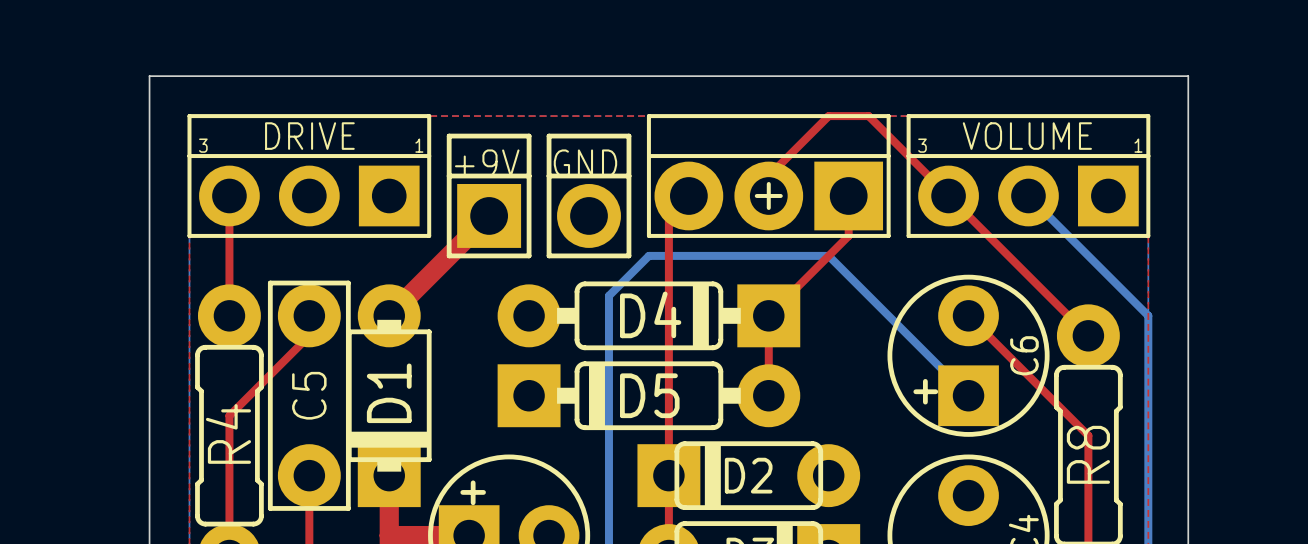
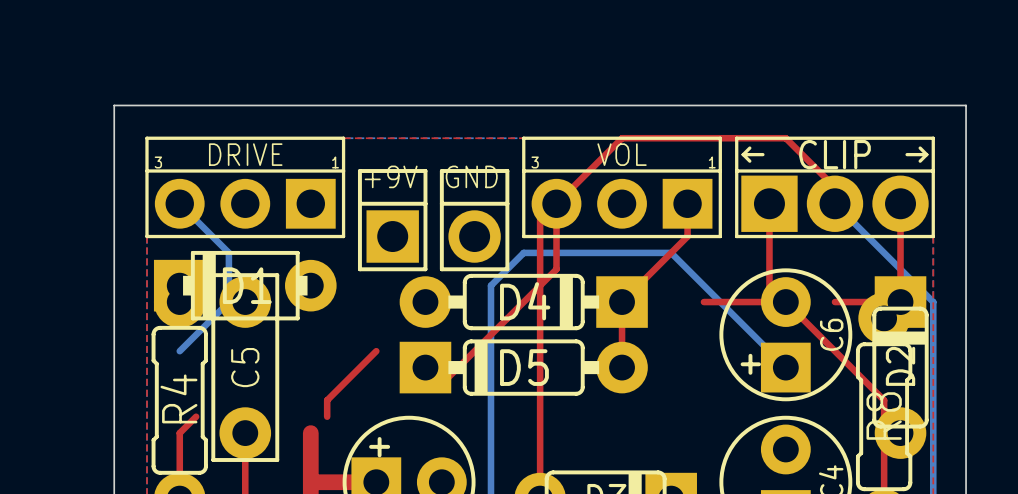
top track: (828, 116) (768, 176) (768, 195) -> (671, 138) (622, 138) (556, 203) (556, 269) (441, 383)
top track: (868, 116) (1088, 335) -> (703, 138) (785, 138) (834, 187) (834, 203)
CLIP side: bottom (768, 176) -> top (834, 187)
VOL: none -> (622, 187)
VOLUME: (1028, 176) -> none
top track: (229, 195) (229, 315) -> none
bottom track: none -> (179, 203) (228, 252) (228, 302) (179, 351)
part position: (489, 195) -> (392, 220)
part position: (589, 195) -> (474, 220)
top track: none -> (769, 203) (769, 302) (703, 302)
top track: none -> (900, 203) (900, 302) (834, 302)
top track: (489, 215) (389, 315) -> none
top track: (309, 315) (309, 335) (229, 415) (229, 475) -> (196, 416) (179, 433)
top track: none -> (376, 351) (327, 400) (327, 416)
D1 rotation: 0° (389, 395) -> 90° clockwise (245, 285)
D2 rotation: 0° (748, 475) -> 90° clockwise (900, 367)
D2 position: (748, 475) -> (900, 367)

